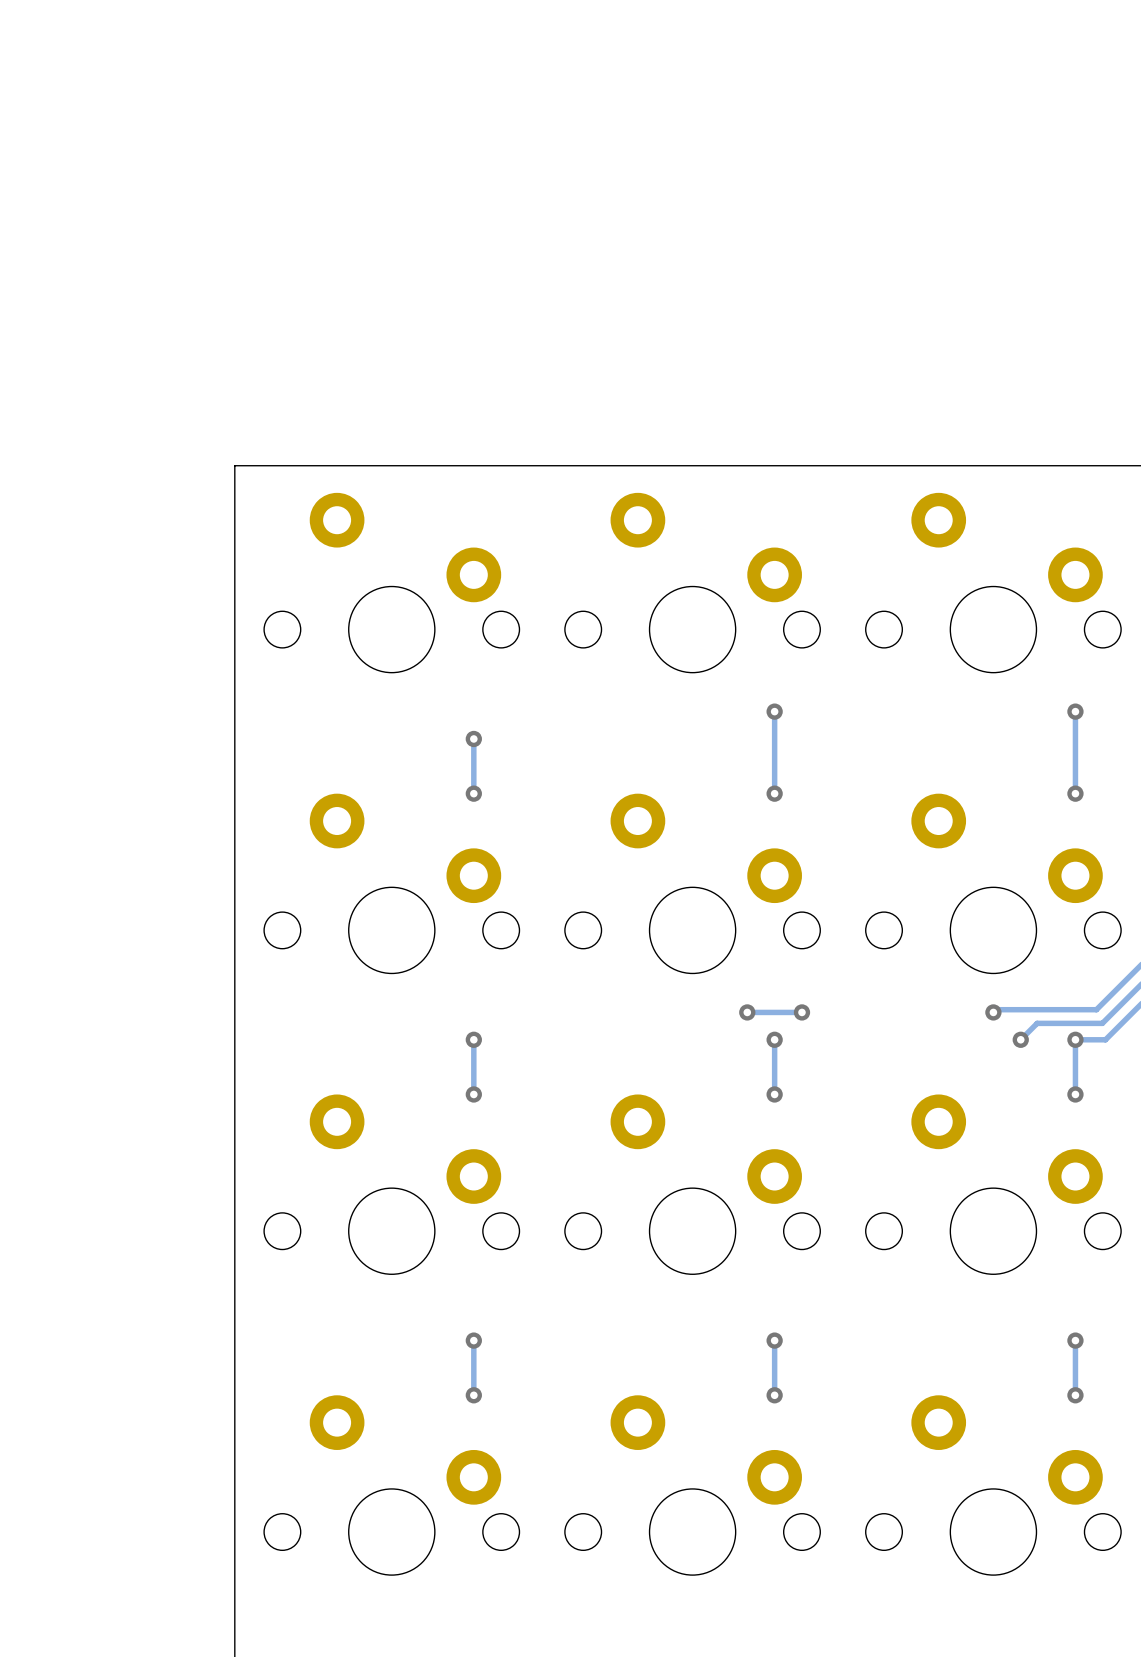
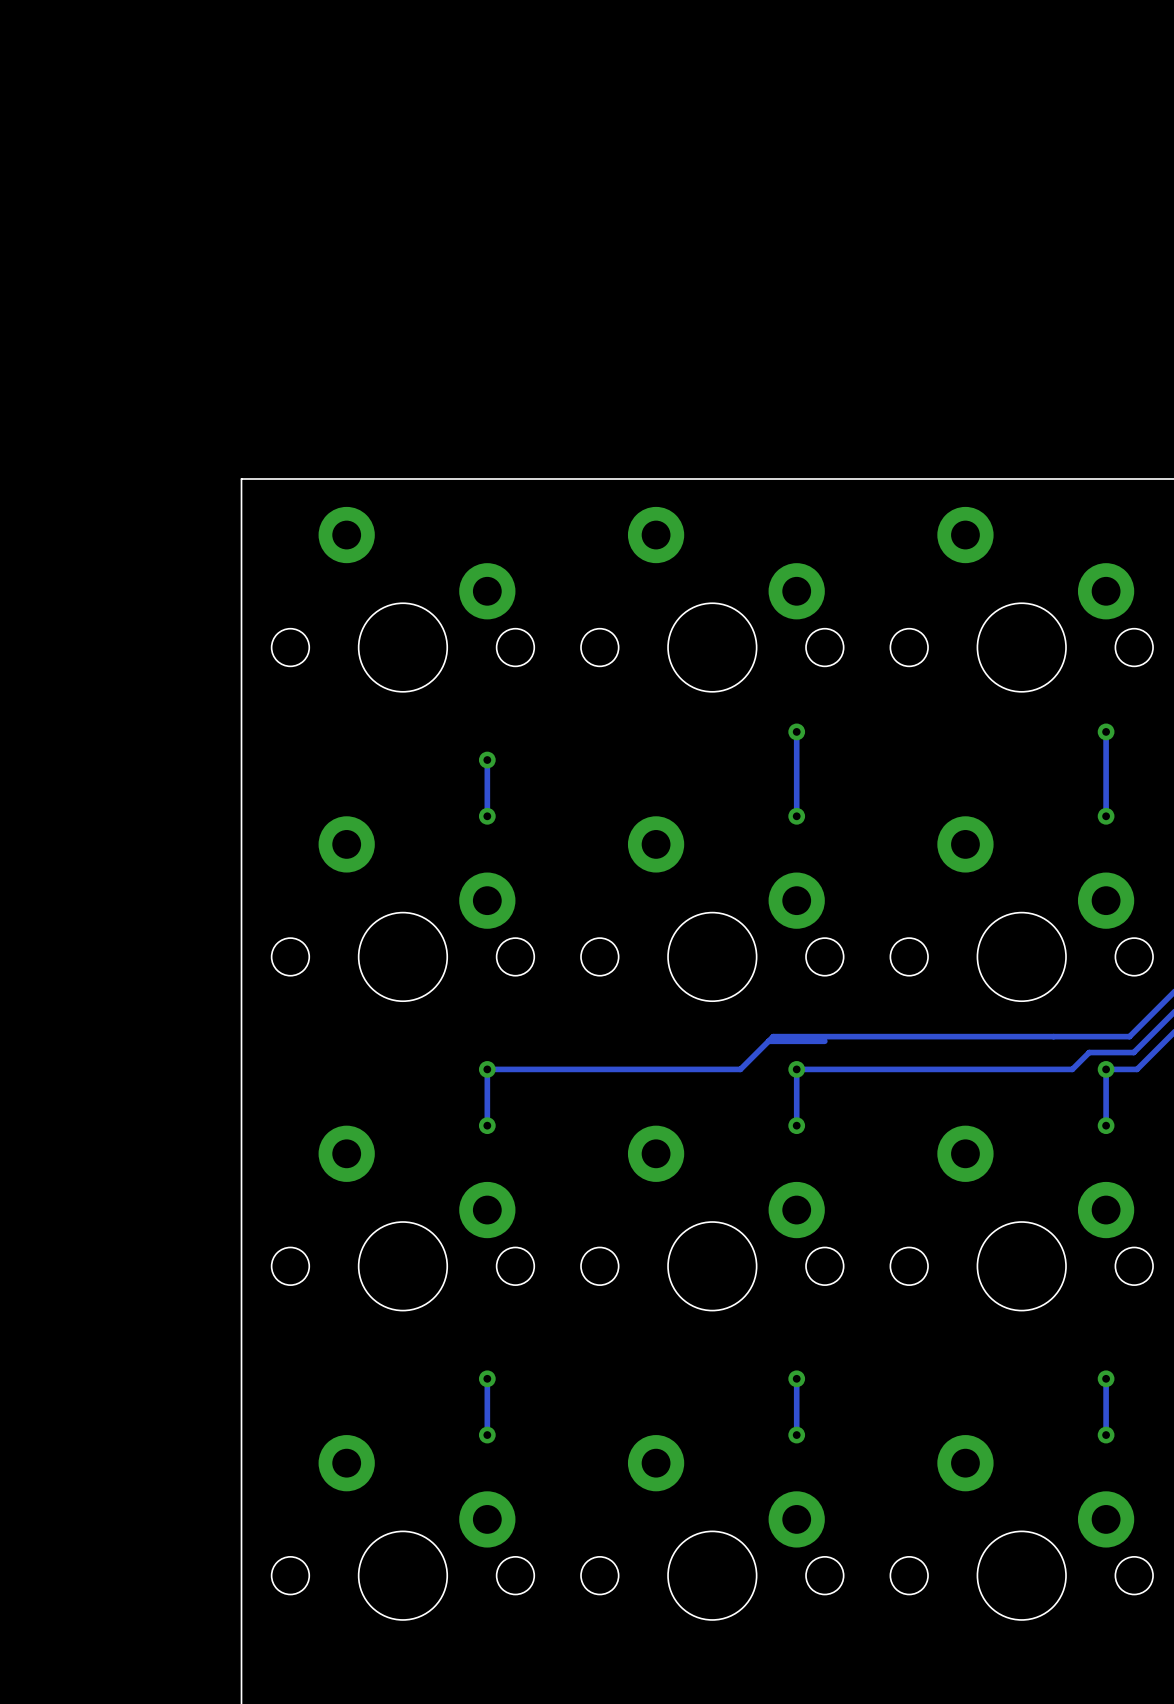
track: (1098, 1007) (1096, 1009) (996, 1009) (993, 1012) -> (1129, 1036) (773, 1036) (740, 1069) (487, 1069)
via: (747, 1012) -> none
via: (801, 1012) -> none
via: (993, 1012) -> none
track: (1059, 1023) (1037, 1023) (1020, 1039) -> (1089, 1052) (1072, 1069) (796, 1069)
via: (1020, 1039) -> none

